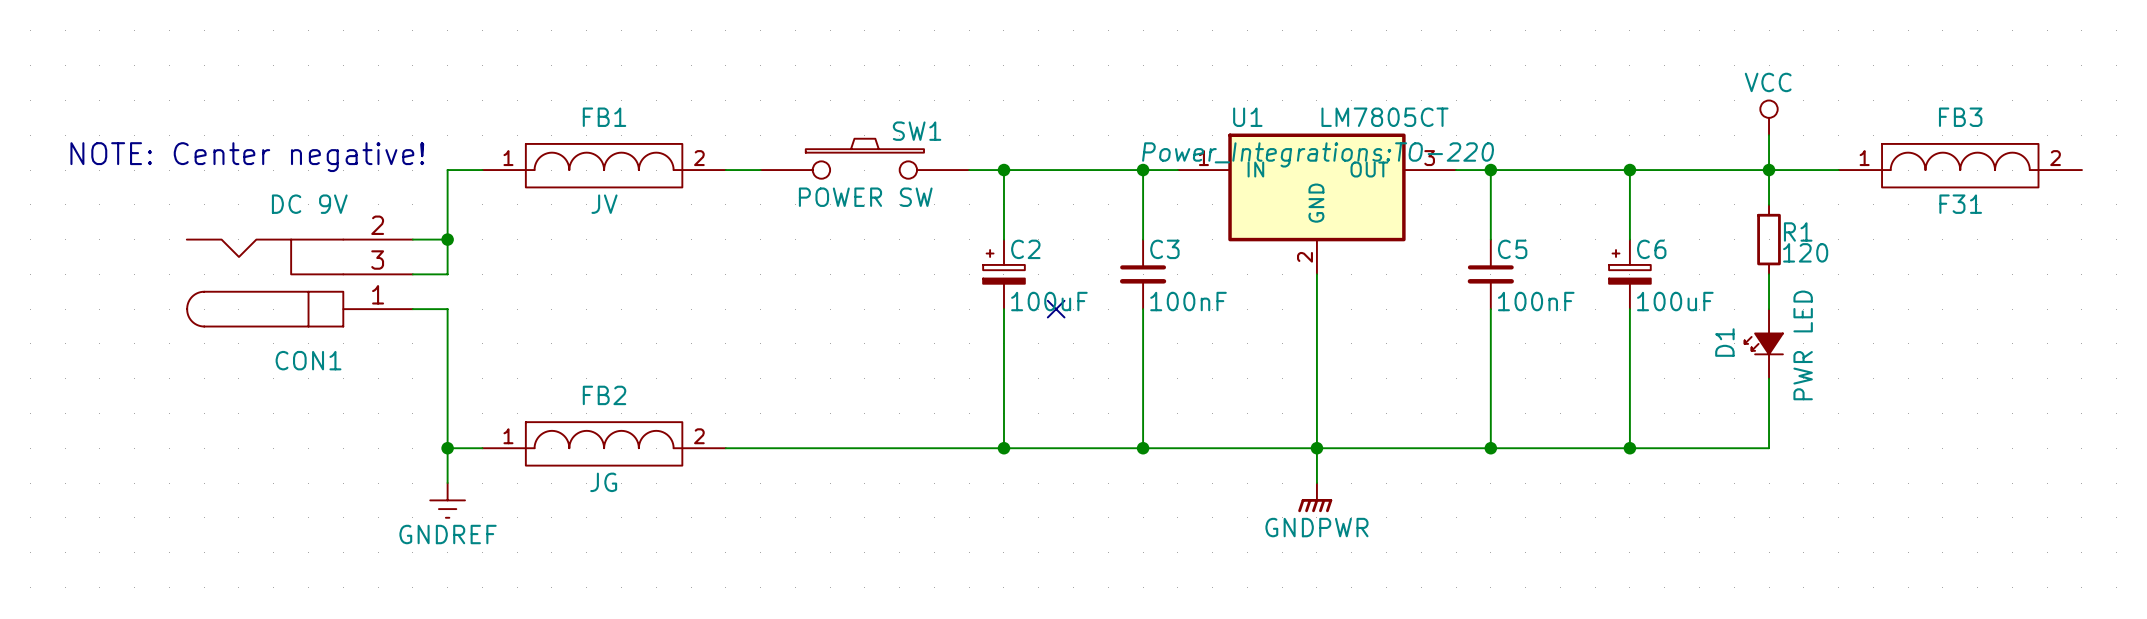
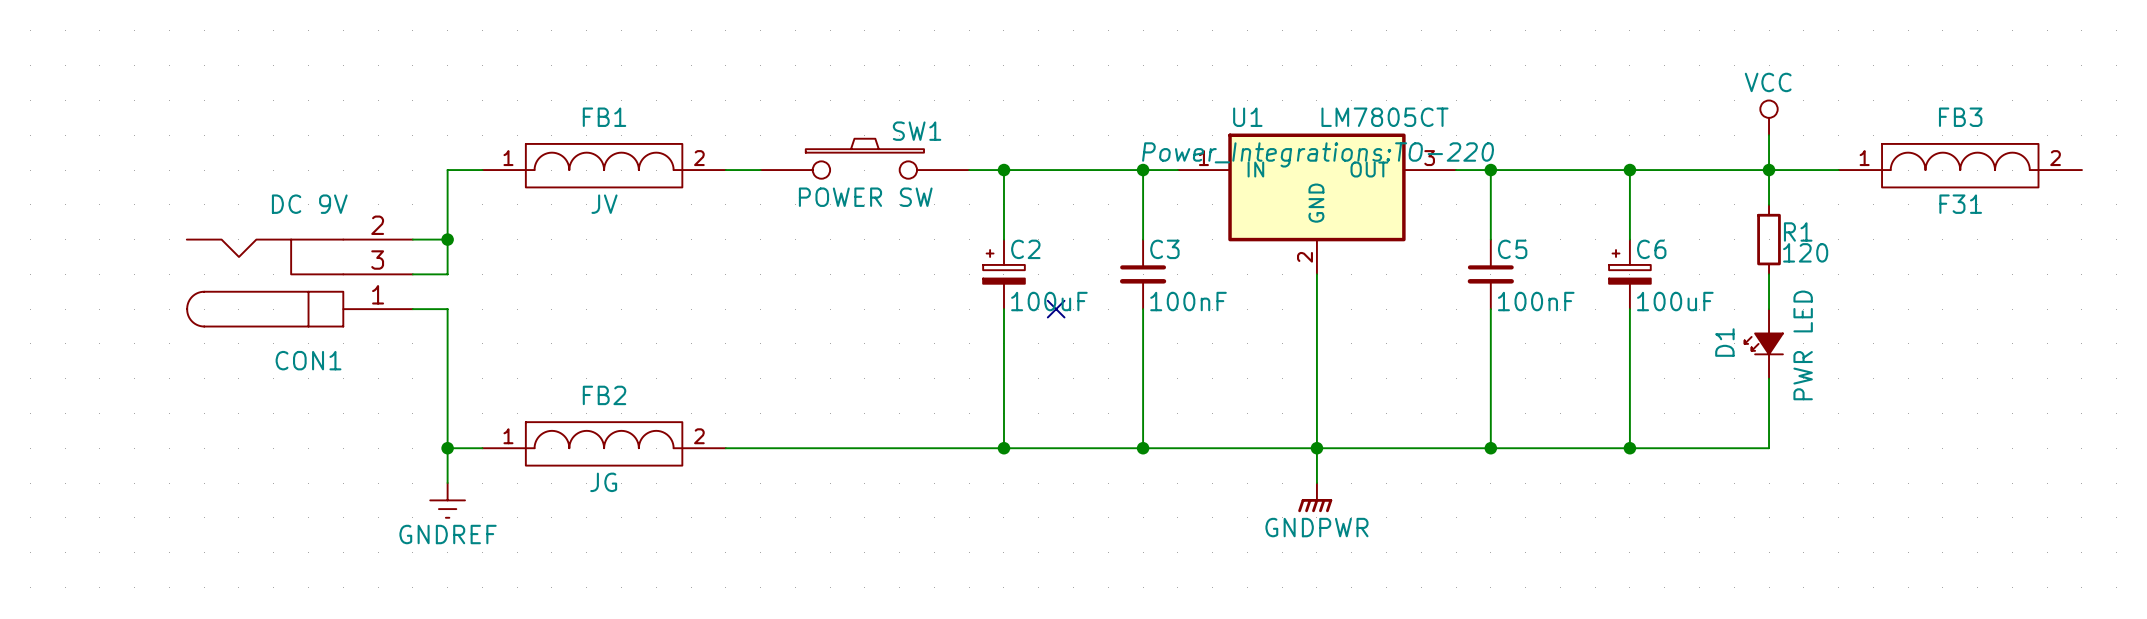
text: NOTE: Center negative! (247, 157) -> none

